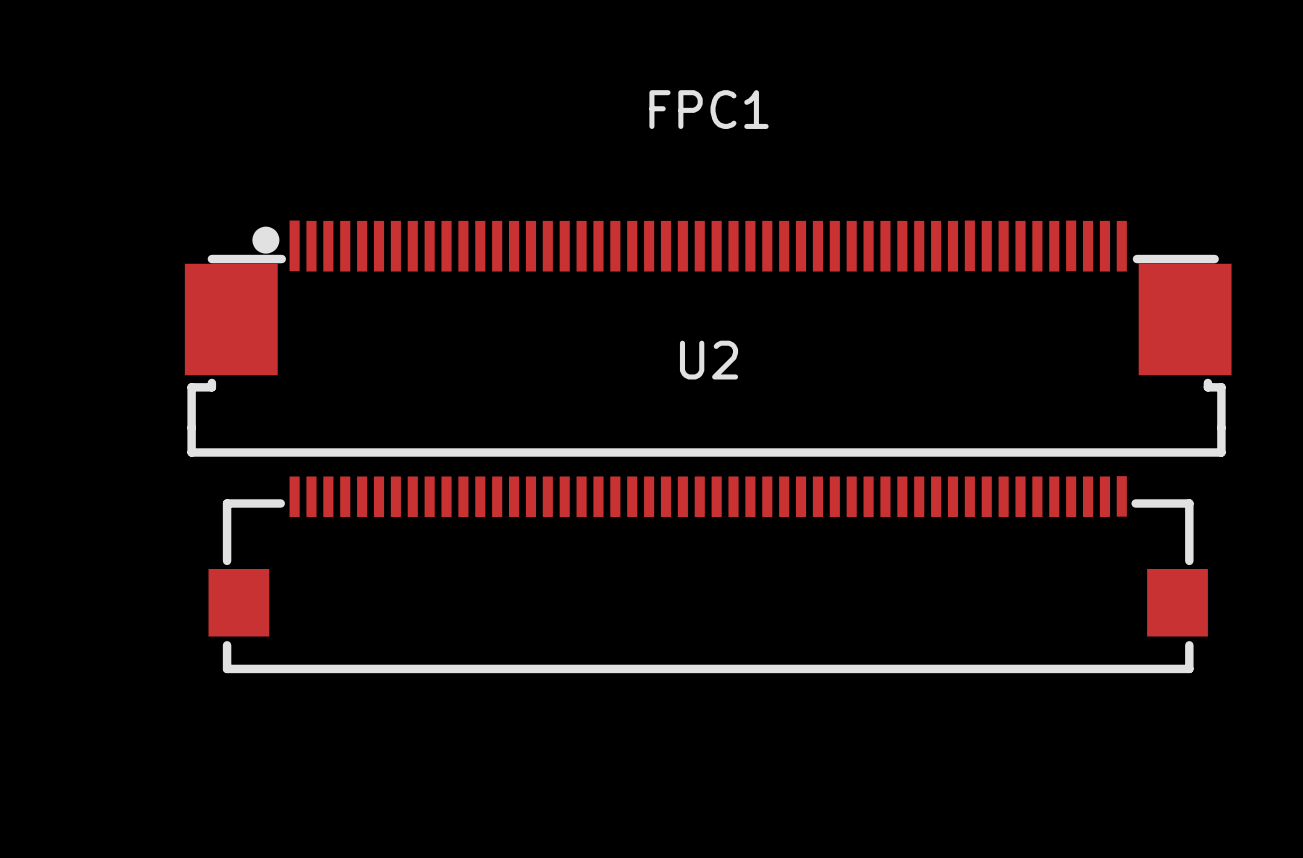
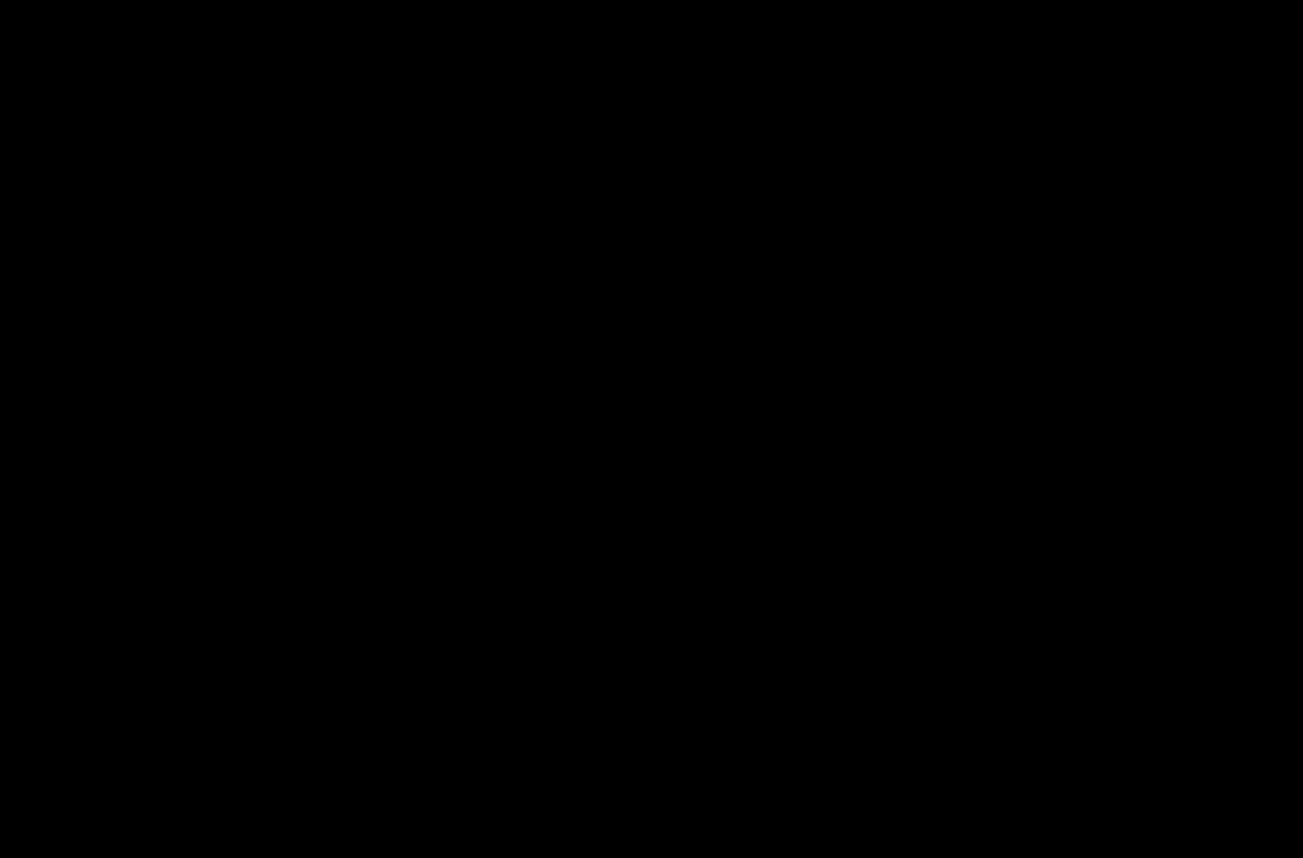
FPC1: (708, 338) -> none
U2: (708, 574) -> none

